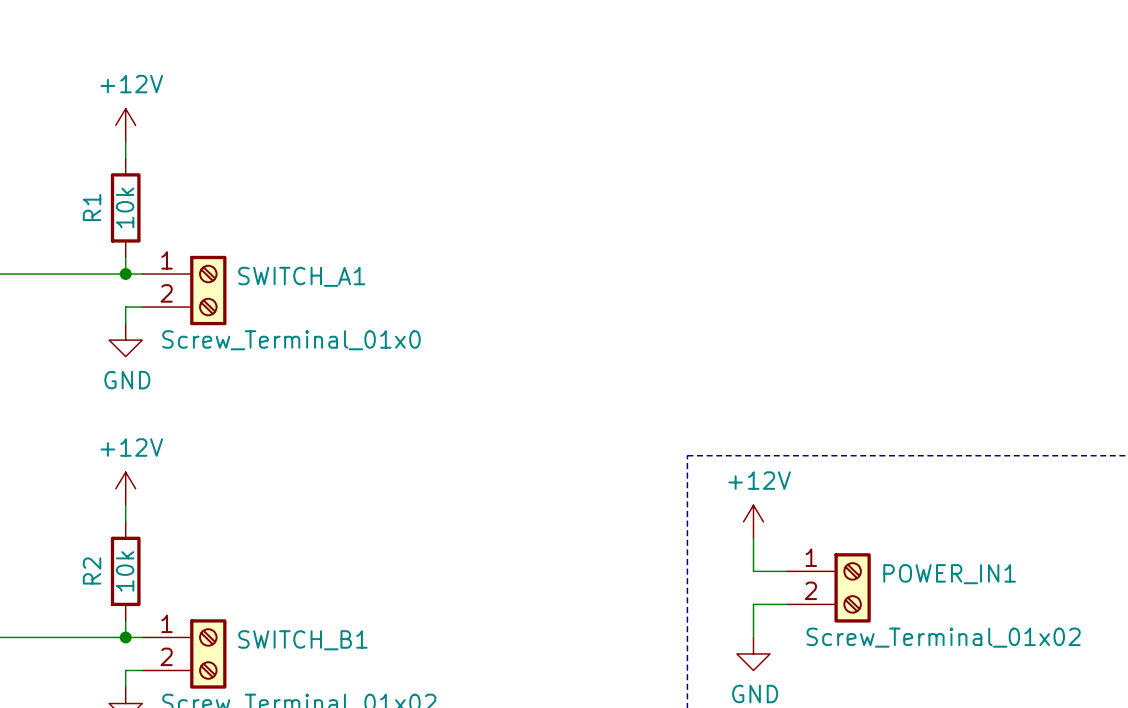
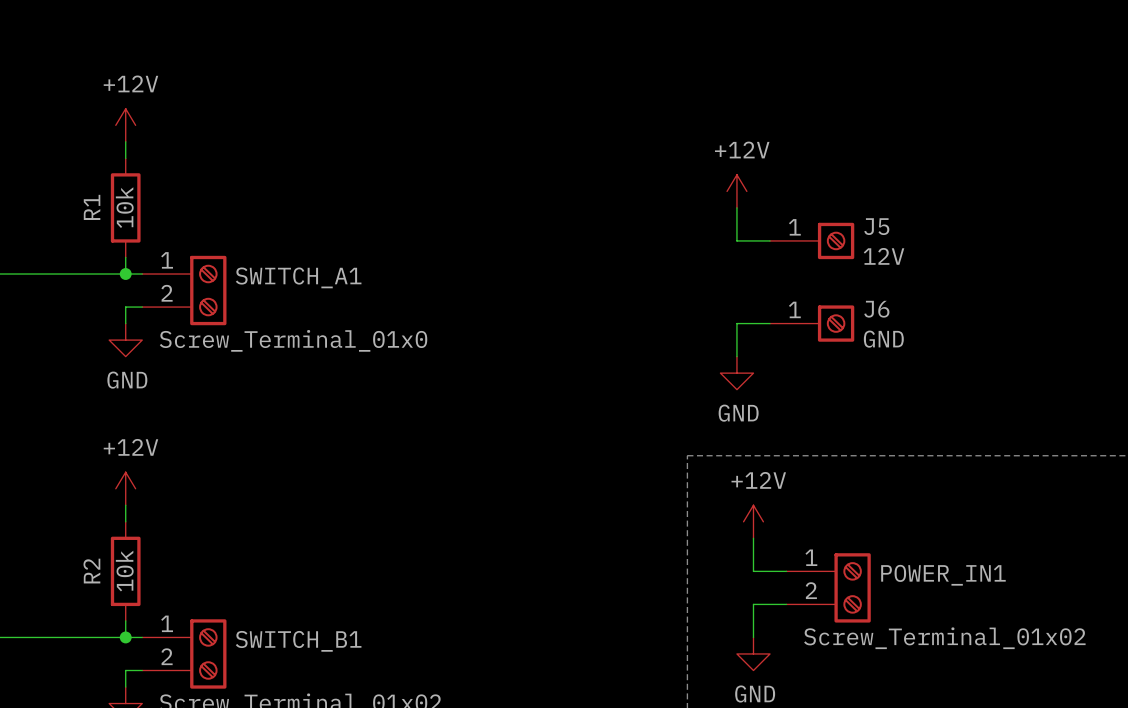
power symbol: none -> +12V (736, 191)
wire: none -> (736, 207) (736, 240) (770, 240)
J5: none -> 12V (812, 240)
wire: none -> (770, 323) (736, 323) (736, 356)
J6: none -> GND (812, 323)
power symbol: none -> GND (736, 373)

